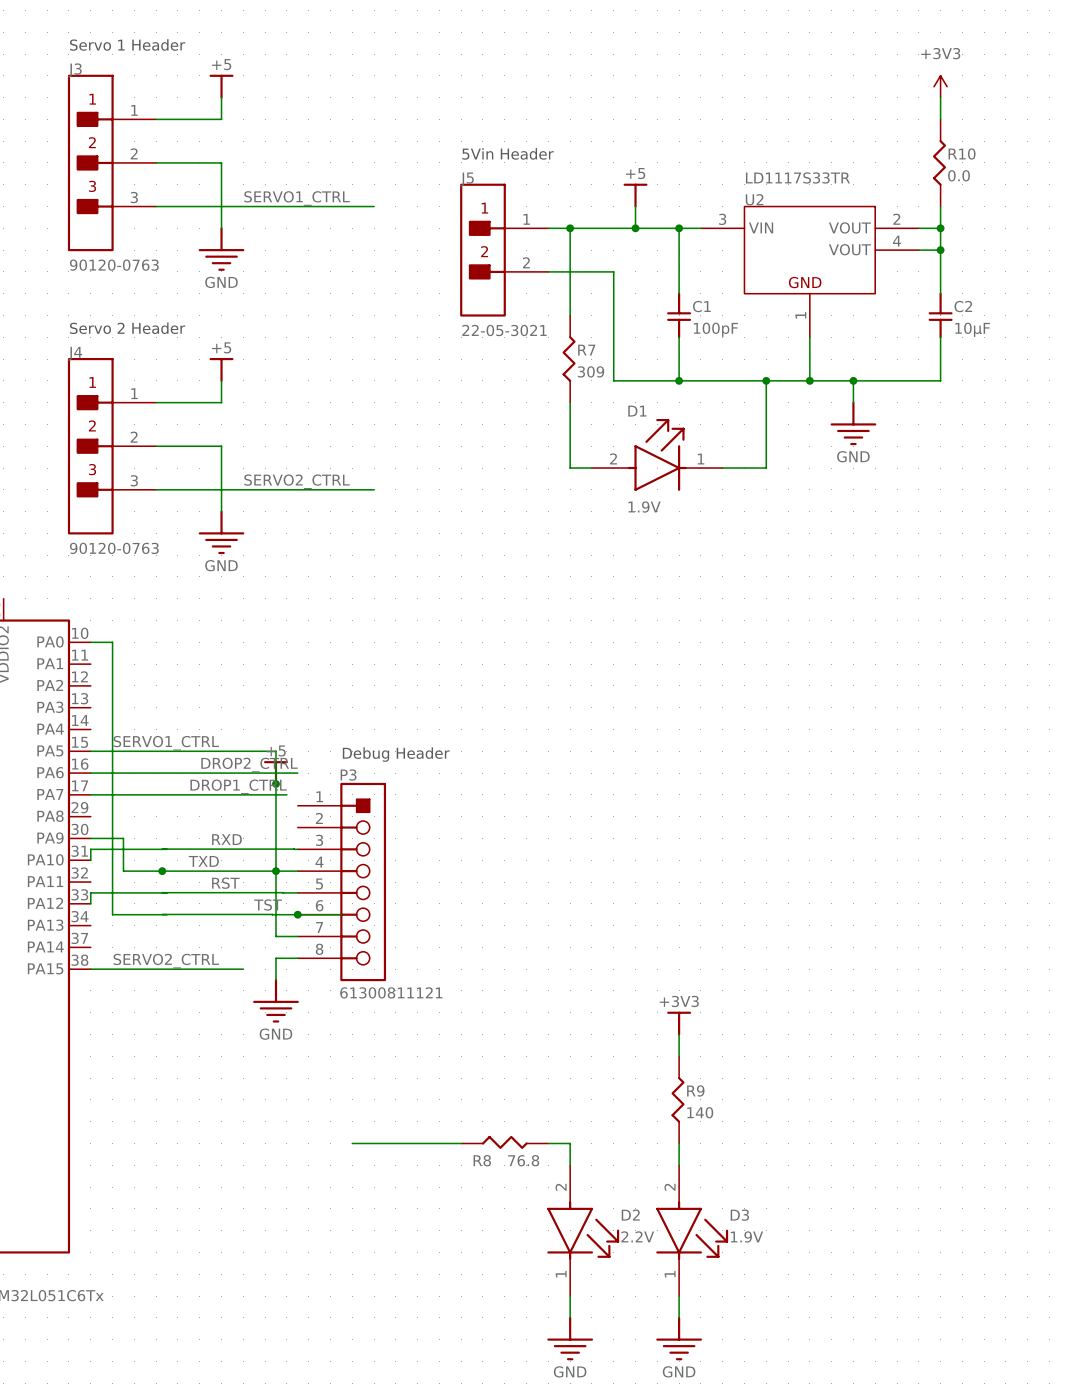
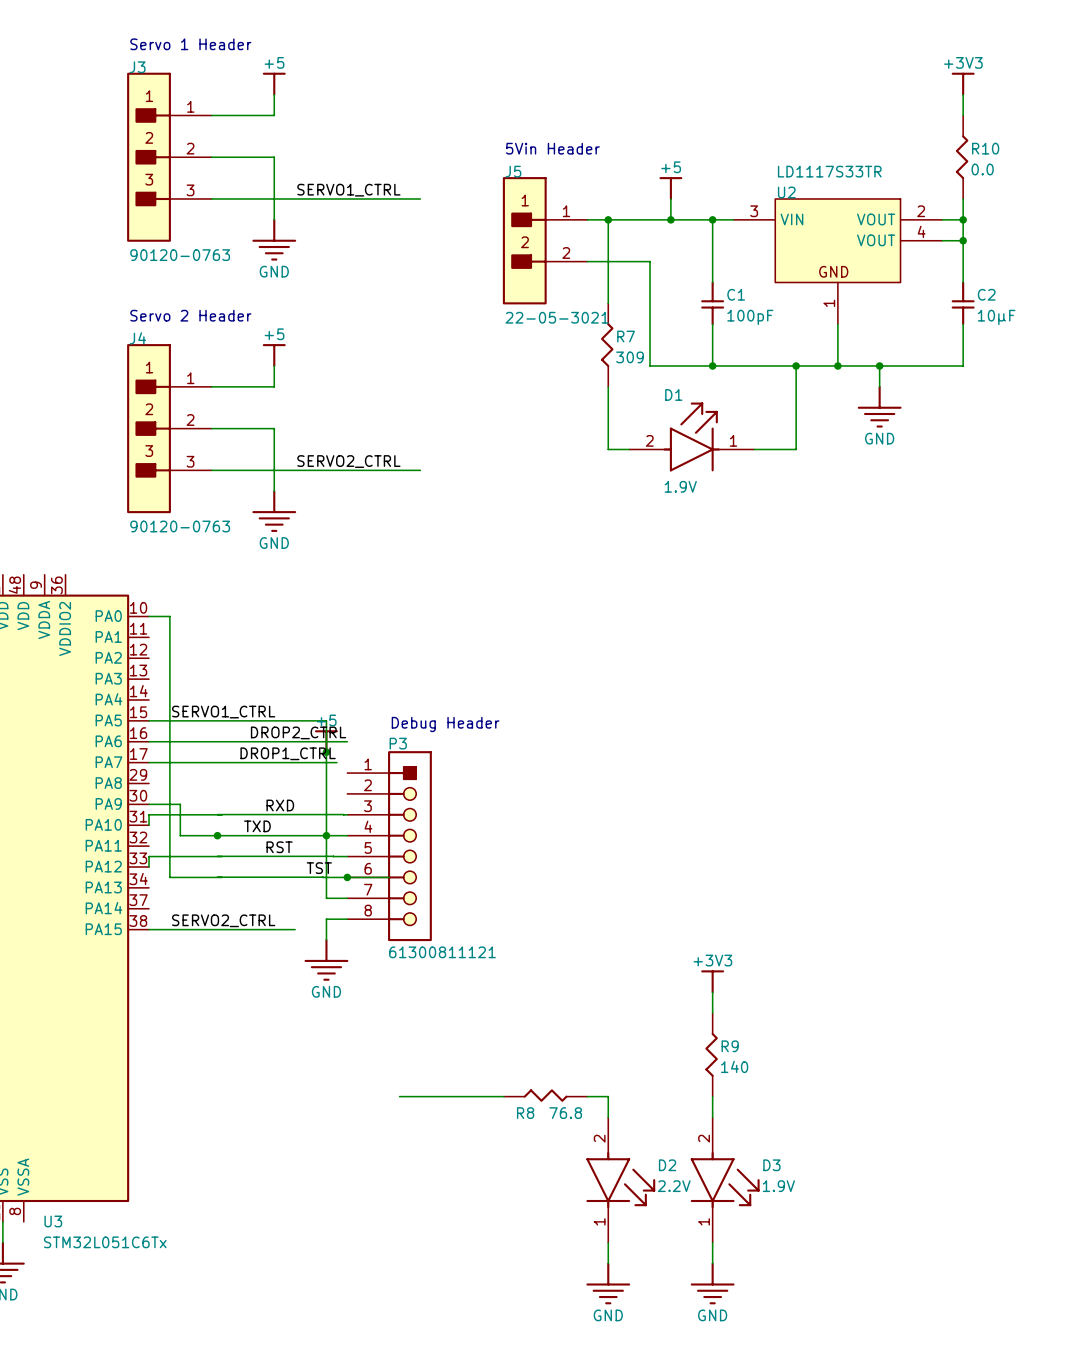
power symbol shape: [934, 75, 948, 98] -> [951, 72, 975, 96]

